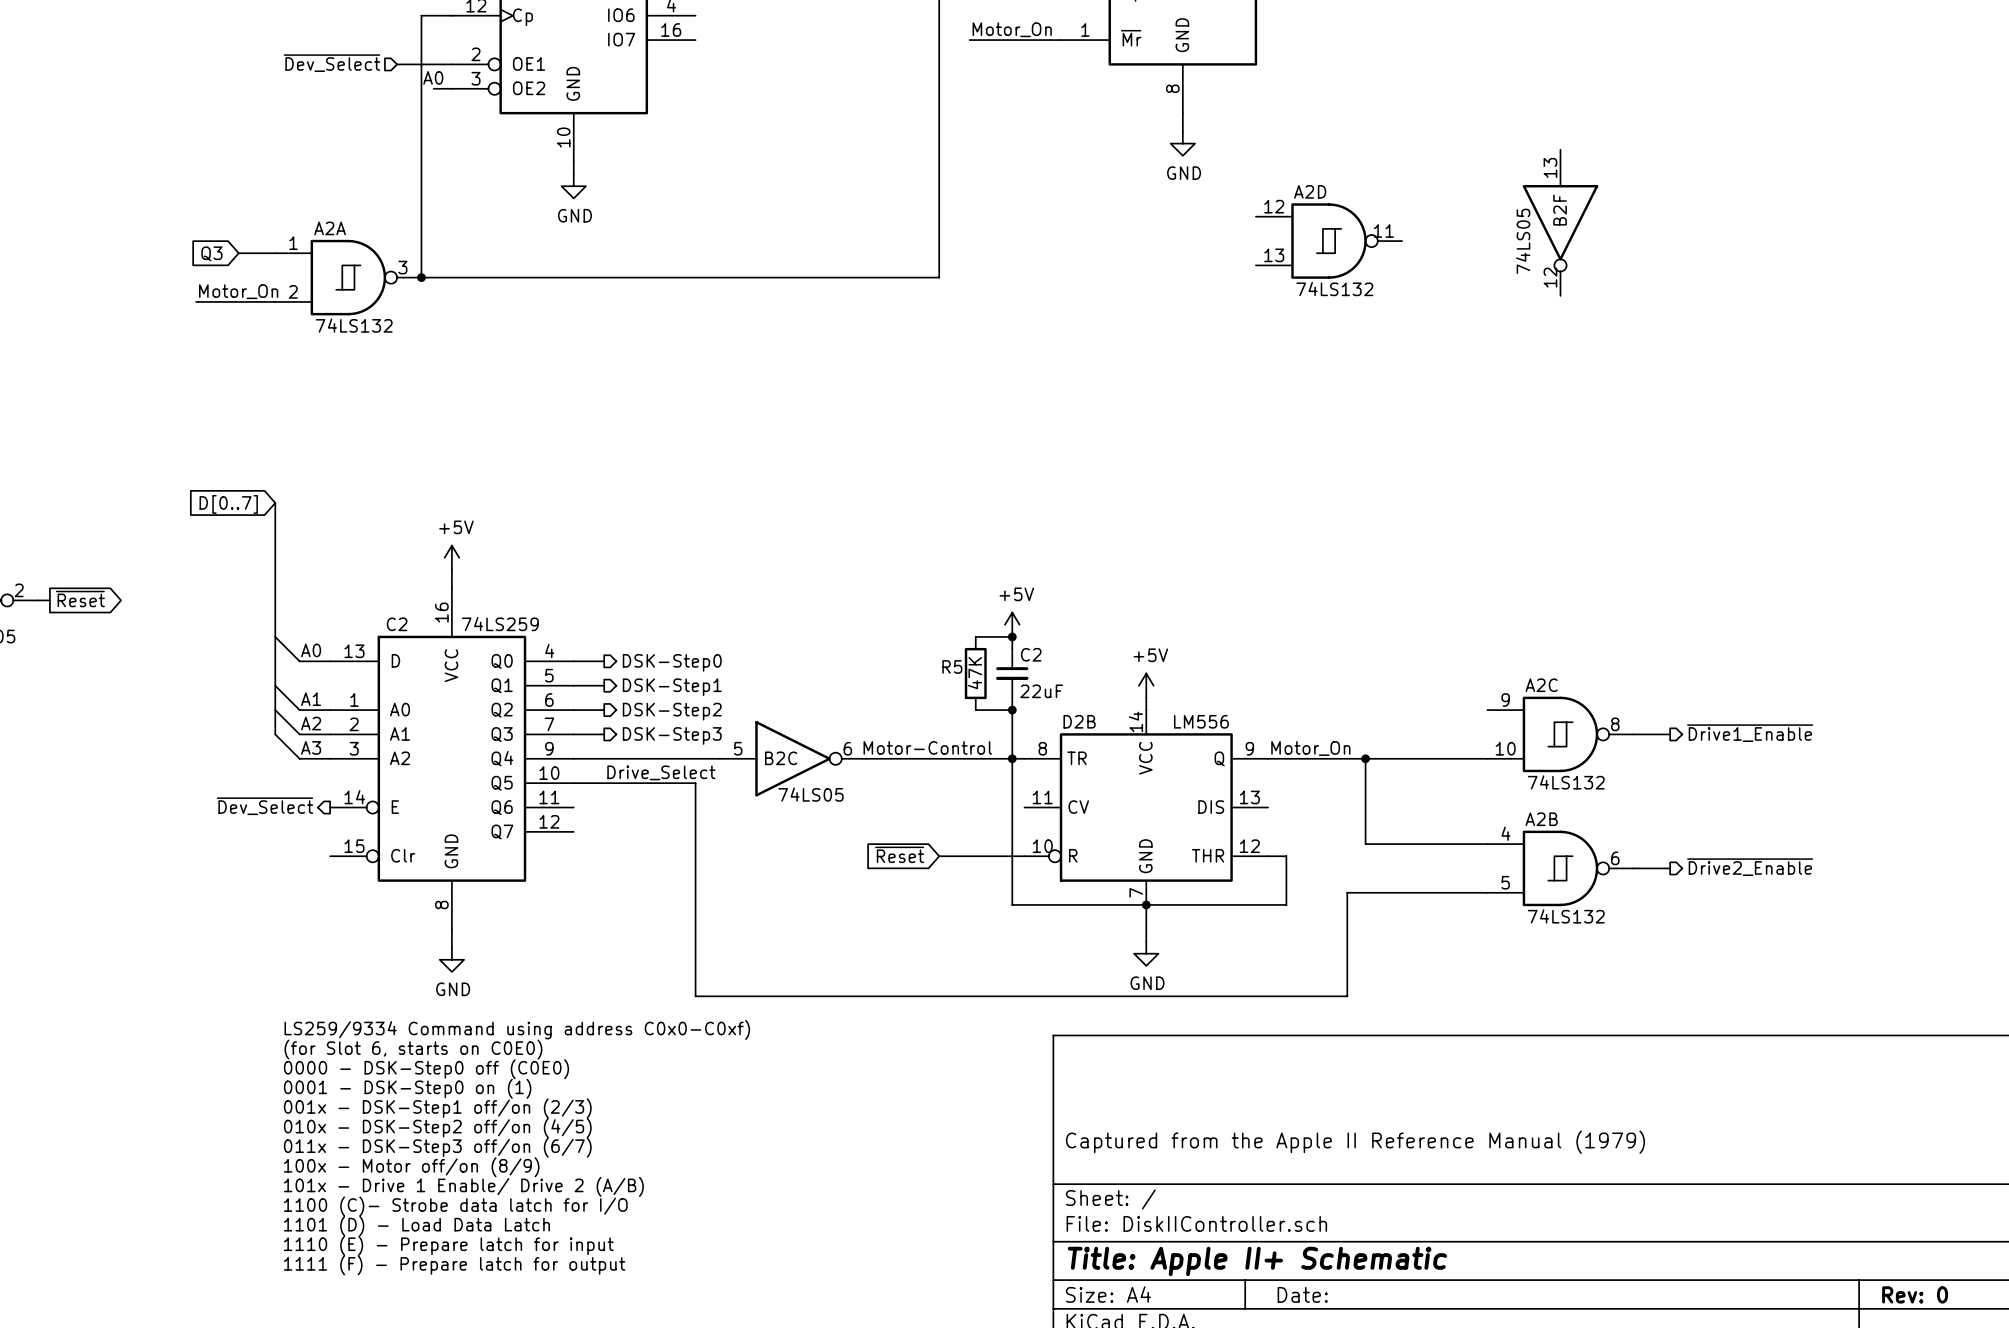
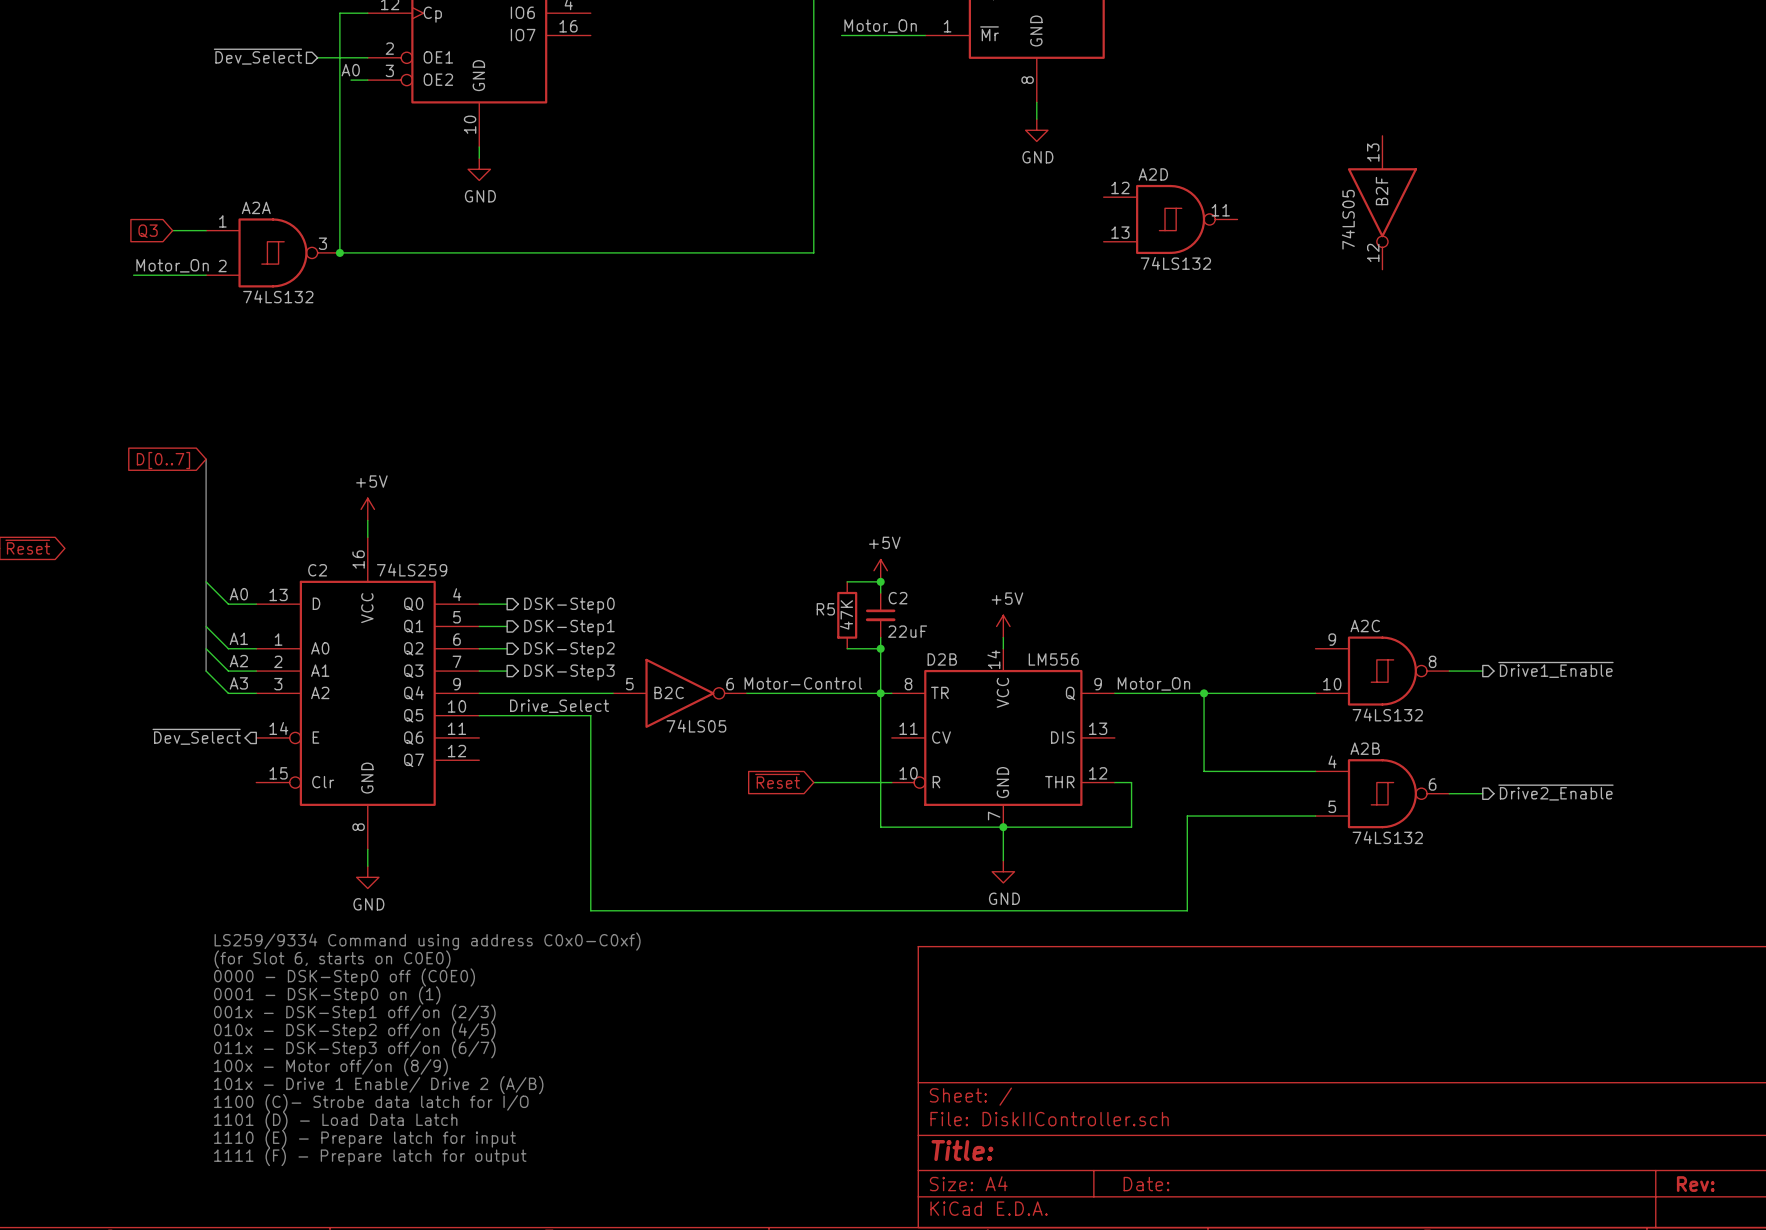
title block: Captured from the Apple II Reference Manual (1979) (1355, 1142) -> none
title block: Title: Apple II+ Schematic (1257, 1261) -> Title: (962, 1150)
title block: Rev: 0 (1915, 1294) -> Rev: (1695, 1184)

